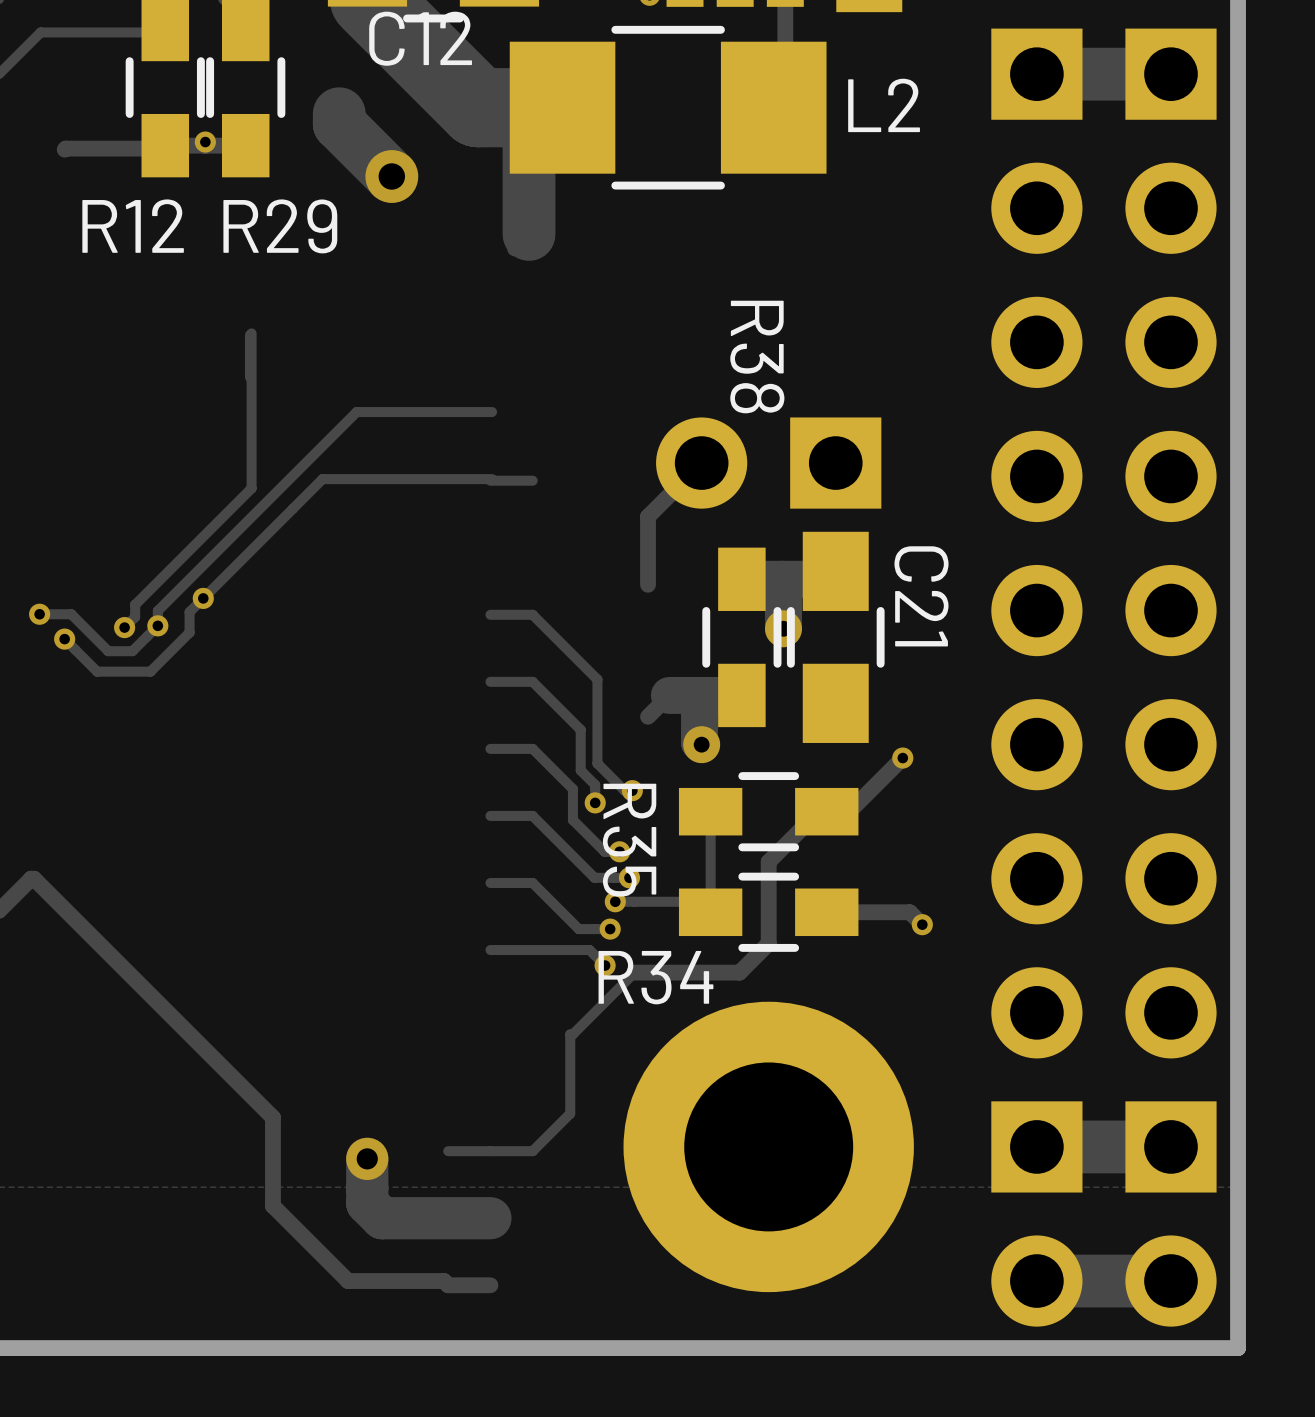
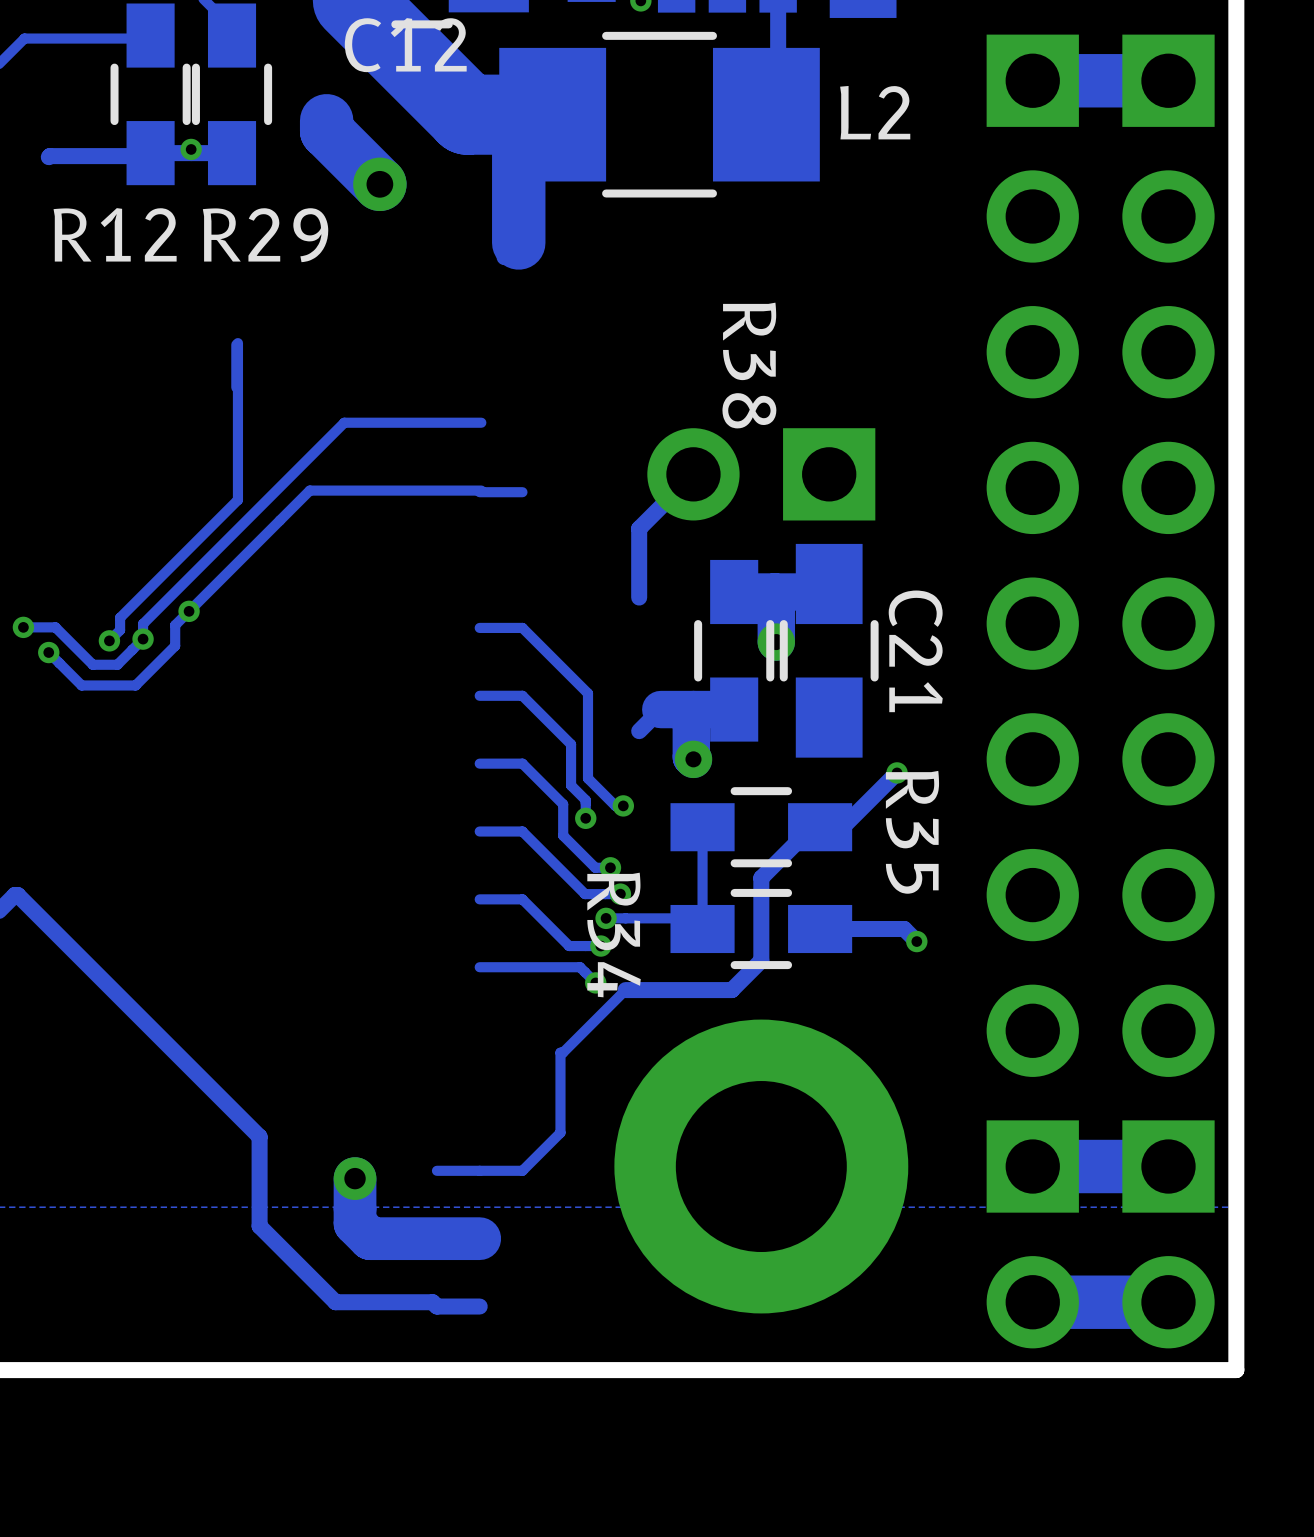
C21 name position: C21 (921, 596) -> C21 (915, 651)
R35 name position: R35 (629, 840) -> R35 (912, 832)
R34 name rotation: 0° (655, 977) -> 90° clockwise (614, 935)

